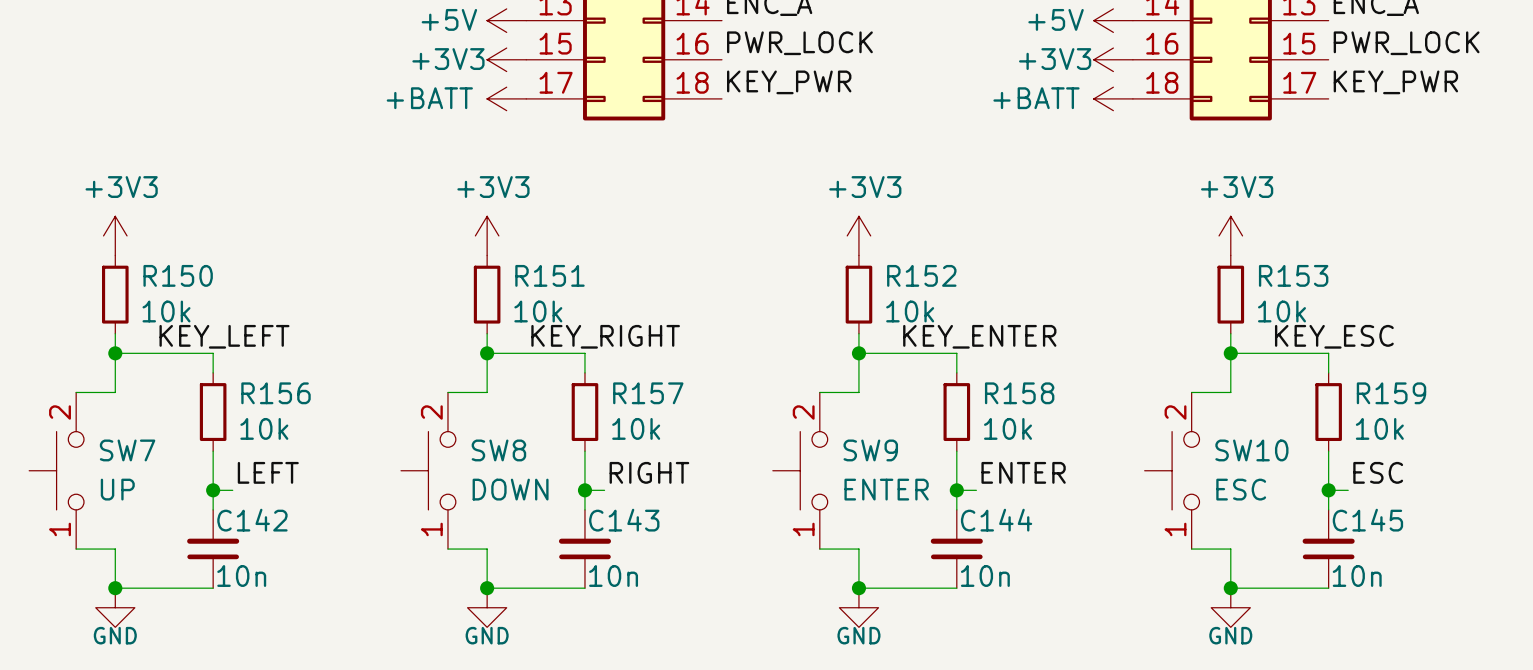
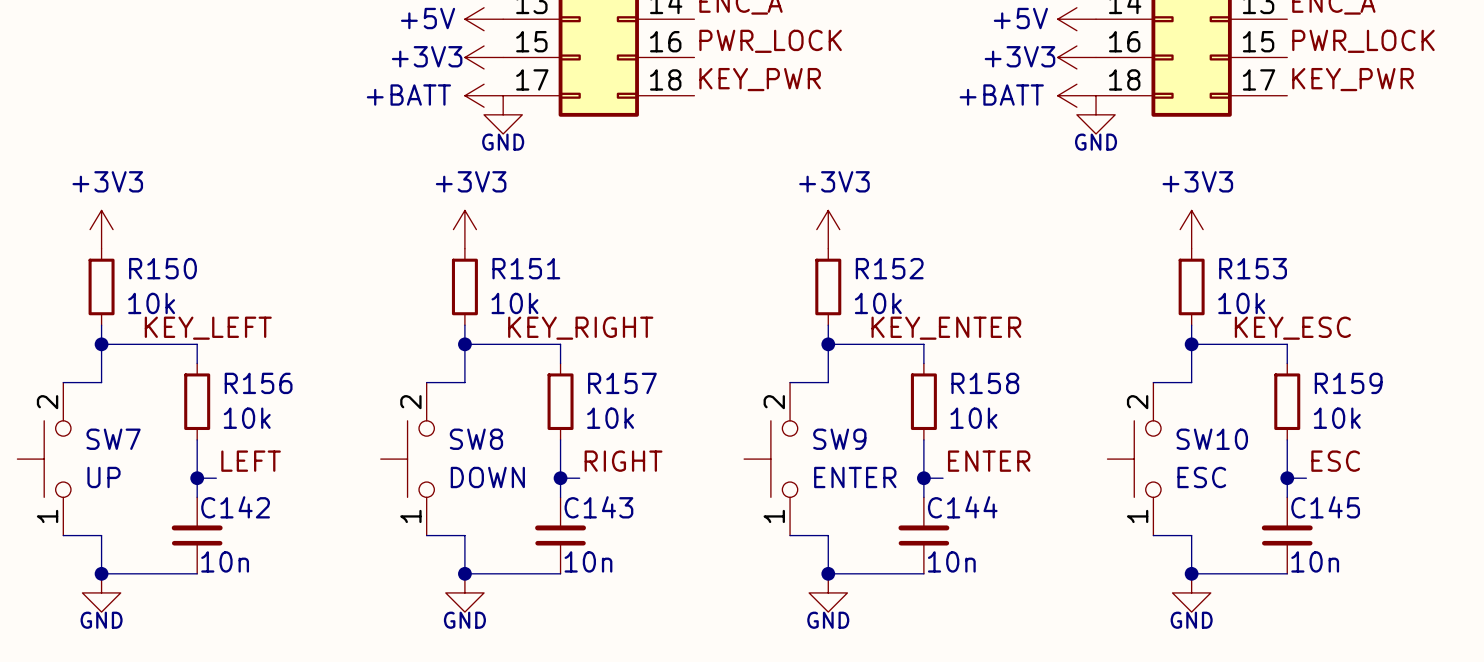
power symbol: none -> GND (503, 114)
power symbol: none -> GND (1096, 114)

